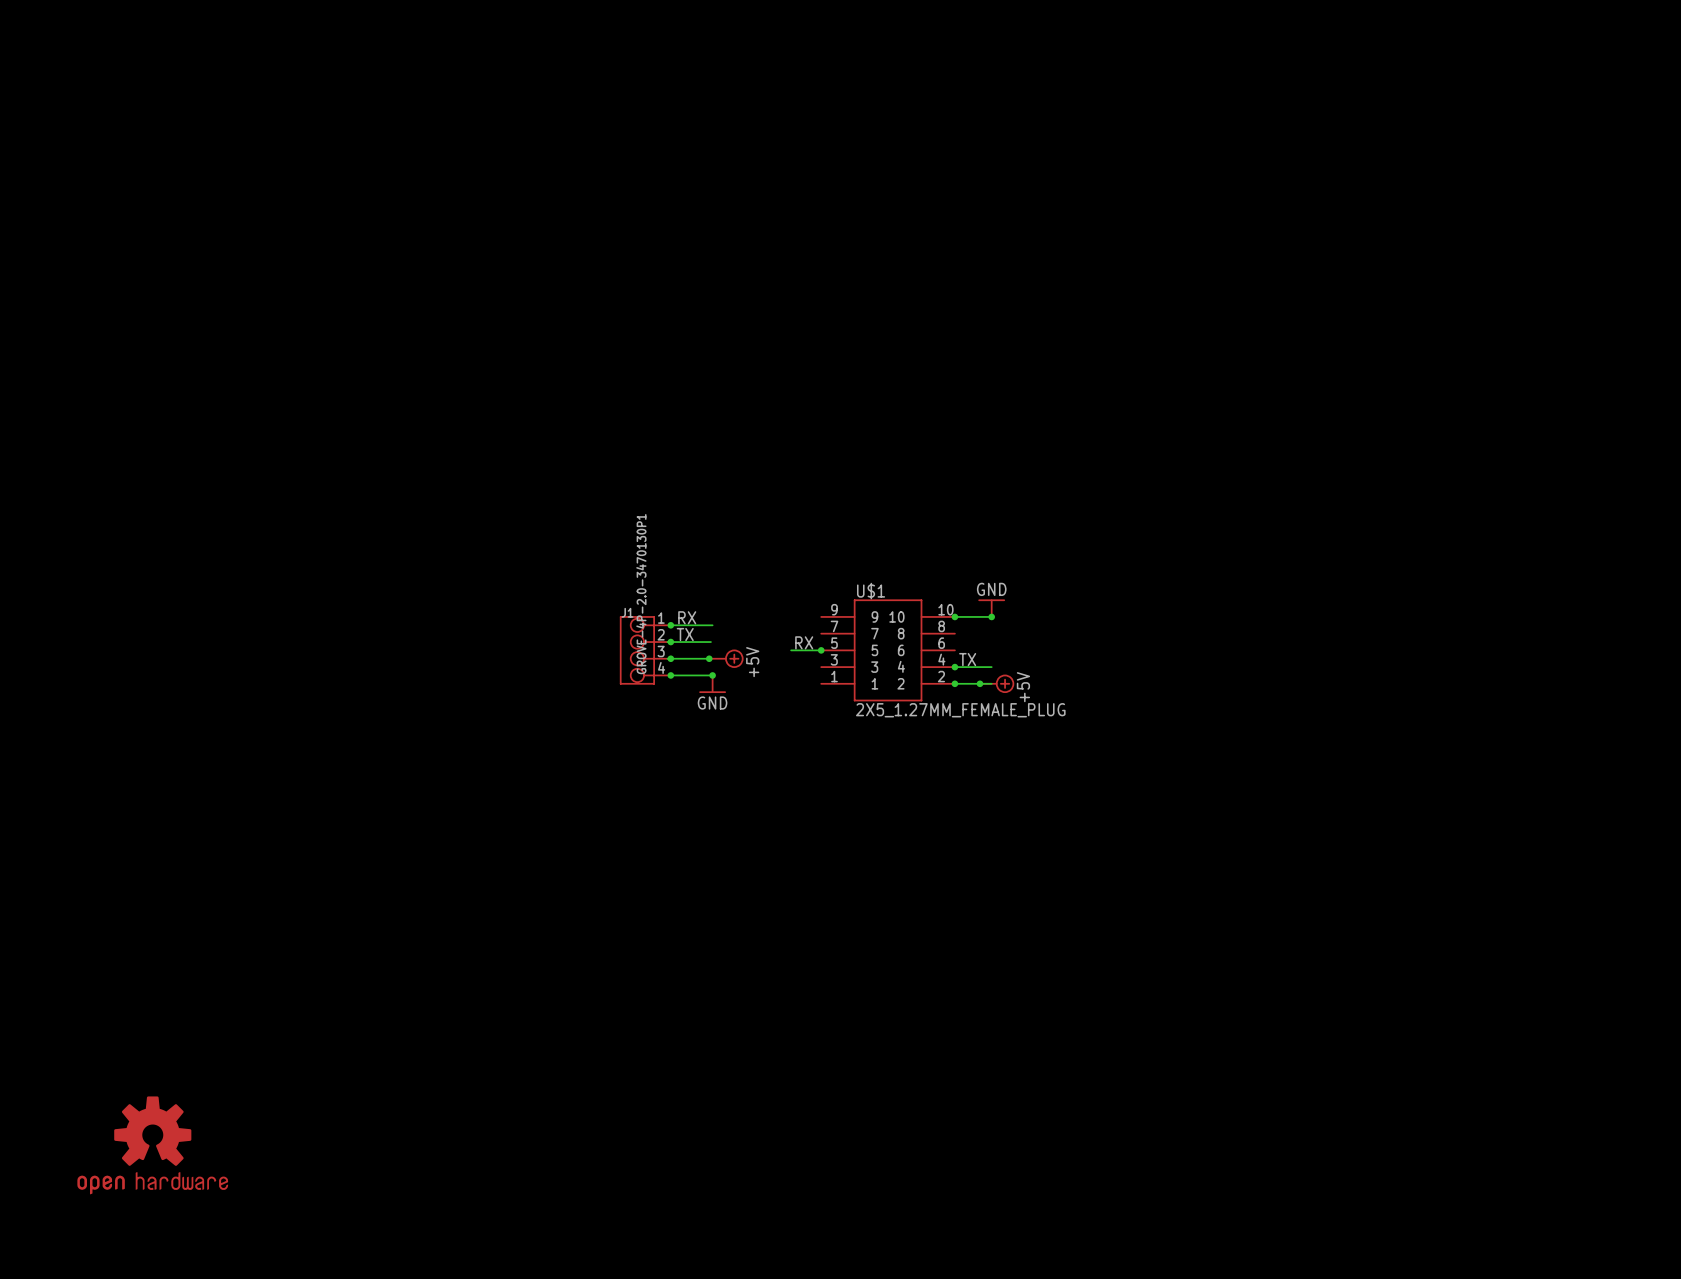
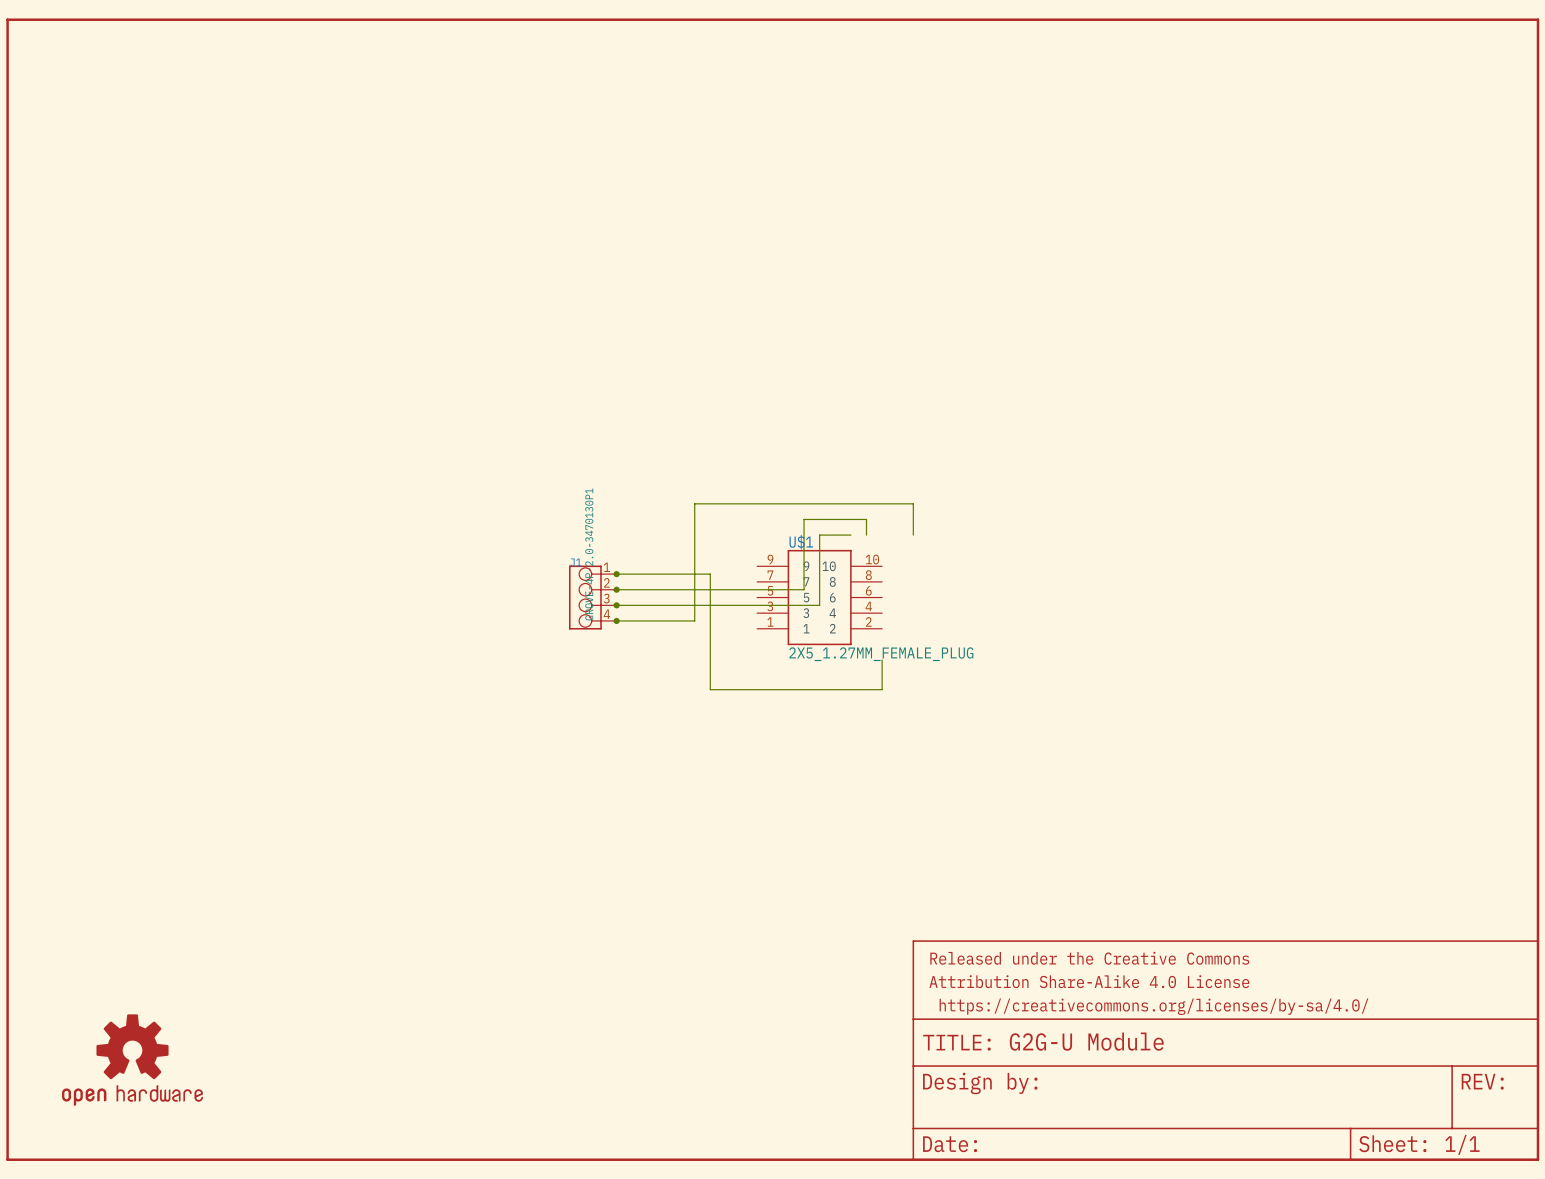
wire: none -> (850, 535) (819, 535) (819, 605) (654, 605)
wire: none -> (866, 535) (866, 519) (804, 519) (804, 589) (654, 589)
wire: none -> (913, 535) (913, 503) (694, 503) (694, 620) (655, 620)
power symbol: GND (991, 608) -> none
wire: (953, 616) (991, 616) -> none
junction: (954, 616) -> none
junction: (991, 616) -> none
label: RX (687, 617) -> none
wire: none -> (655, 574) (710, 574) (710, 689) (882, 689) (882, 660)
label: TX (685, 634) -> none
label: RX (804, 642) -> none
part: none -> (772, 589)
wire: (791, 650) (822, 650) -> none
junction: (821, 650) -> none
junction: (709, 658) -> none
power symbol: +5V (726, 658) -> none
label: TX (967, 659) -> none
wire: (954, 667) (991, 667) -> none
junction: (954, 667) -> none
junction: (712, 675) -> none
wire: (954, 683) (991, 683) -> none
junction: (954, 683) -> none
junction: (979, 683) -> none
power symbol: +5V (997, 683) -> none
power symbol: GND (712, 684) -> none
part: none -> (1225, 1050)

